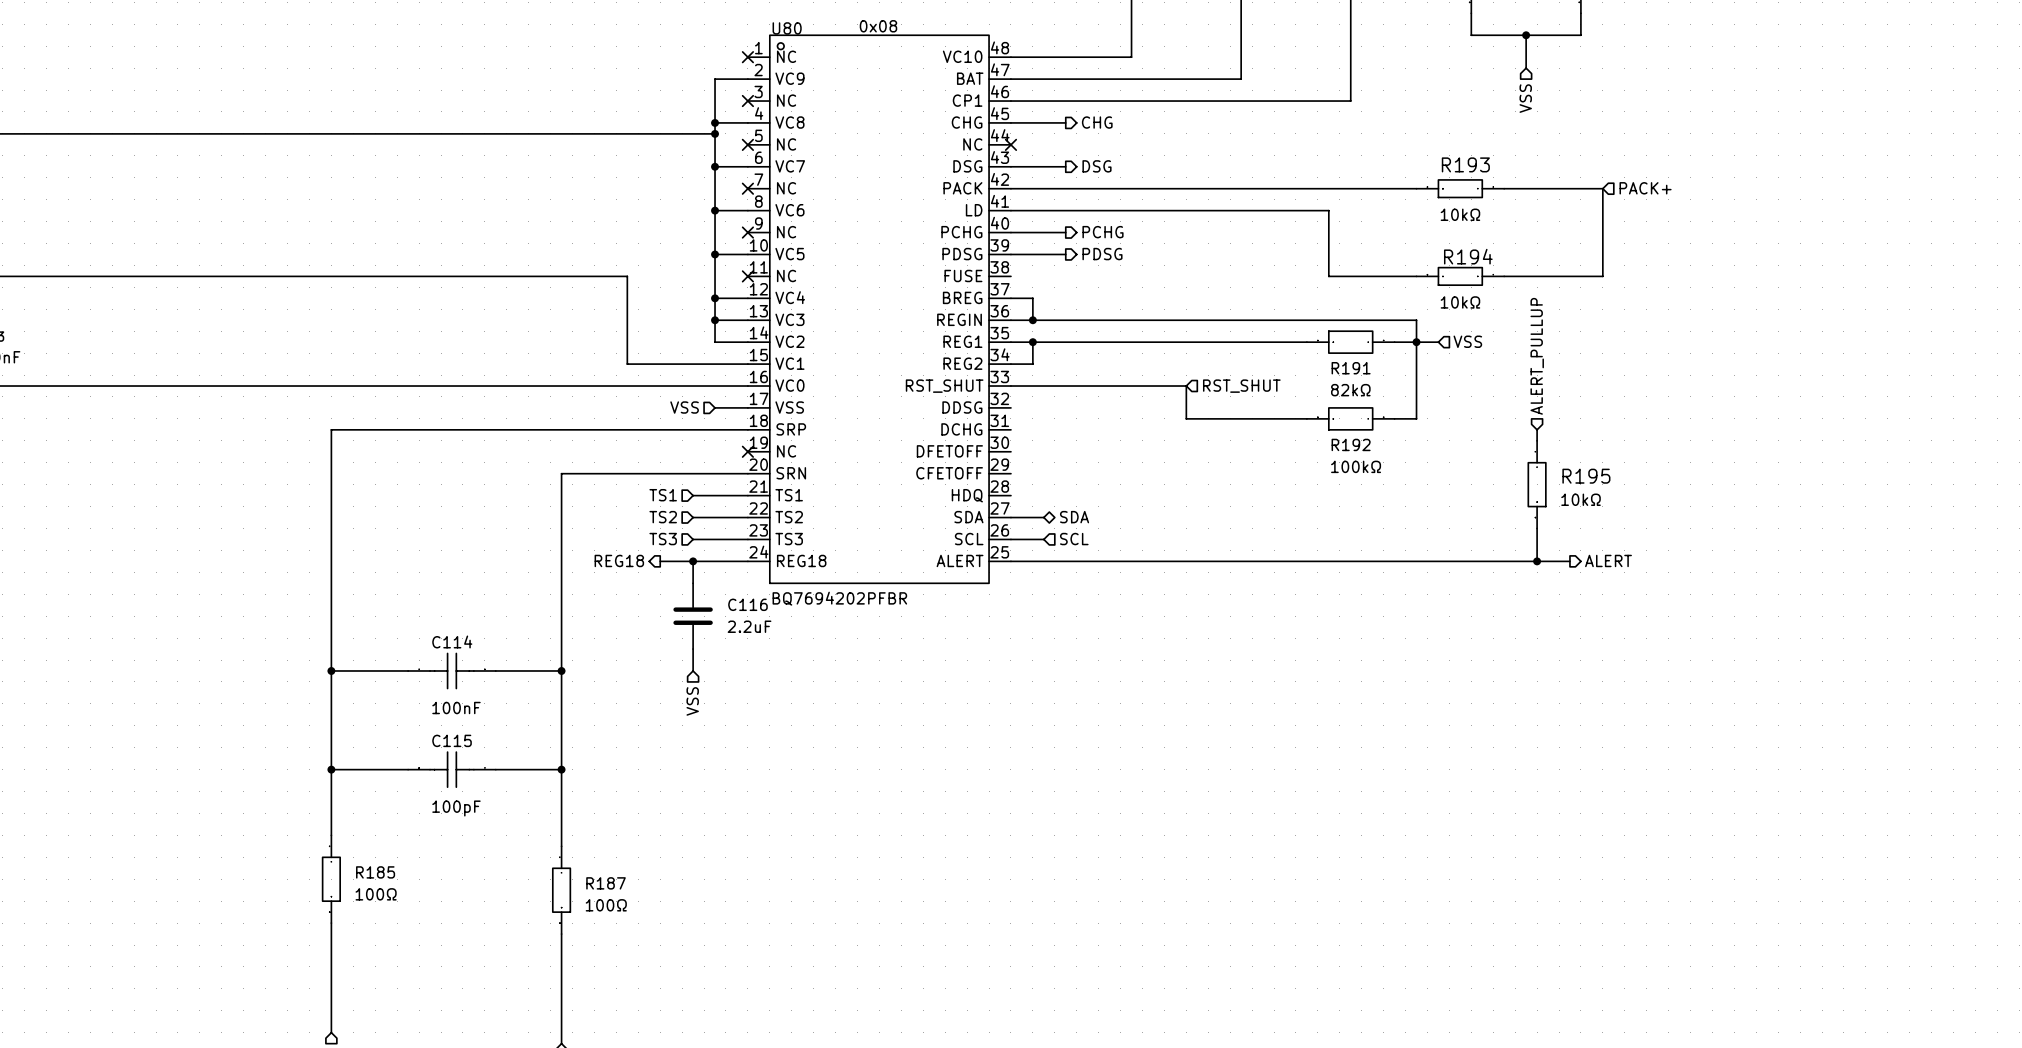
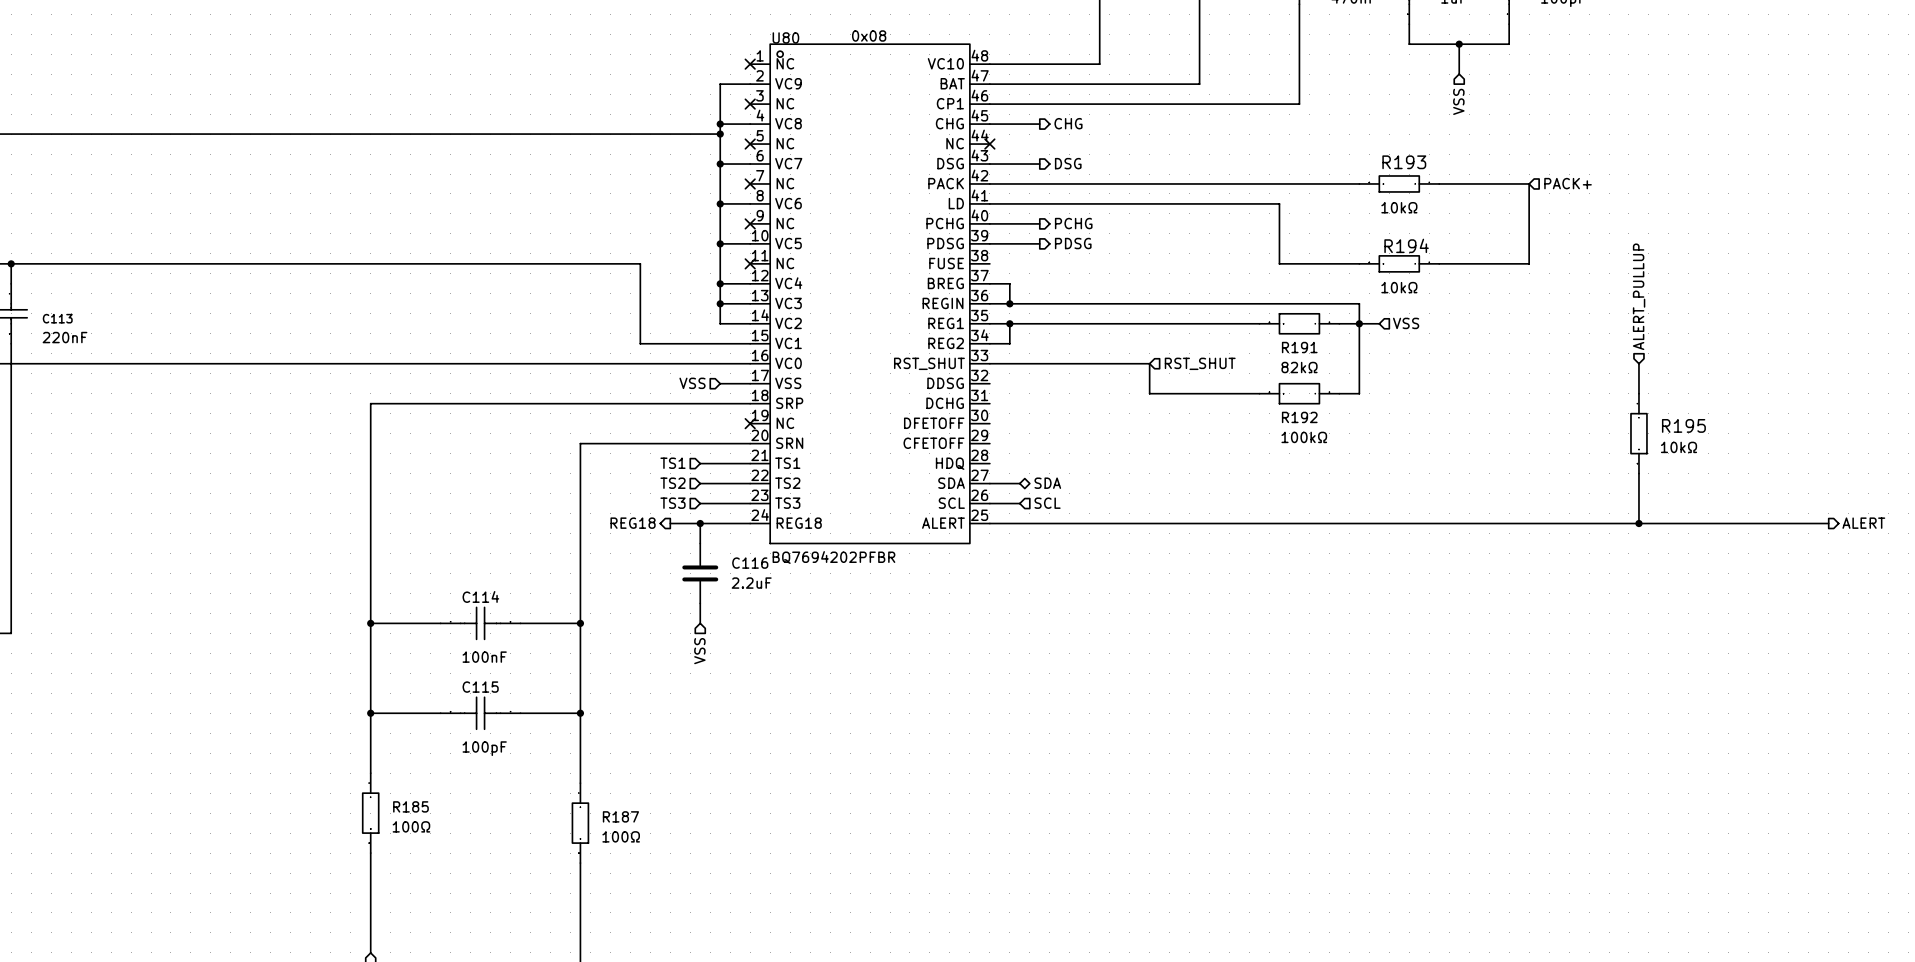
hierarchical label position: ALERT_PULLUP (1537, 356) -> ALERT_PULLUP (1639, 296)
wire: none -> (1638, 363) (1638, 393)
wire: (1537, 429) (1537, 440) -> none
R195 position: (1537, 484) -> (1638, 433)
wire: none -> (1638, 473) (1638, 523)
wire: (1537, 528) (1537, 561) -> none
hierarchical label: ALERT (1608, 560) -> none
hierarchical label: none -> ALERT (1863, 523)
junction: (1537, 561) -> none
wire: none -> (1499, 523) (1828, 523)
junction: none -> (1638, 523)

